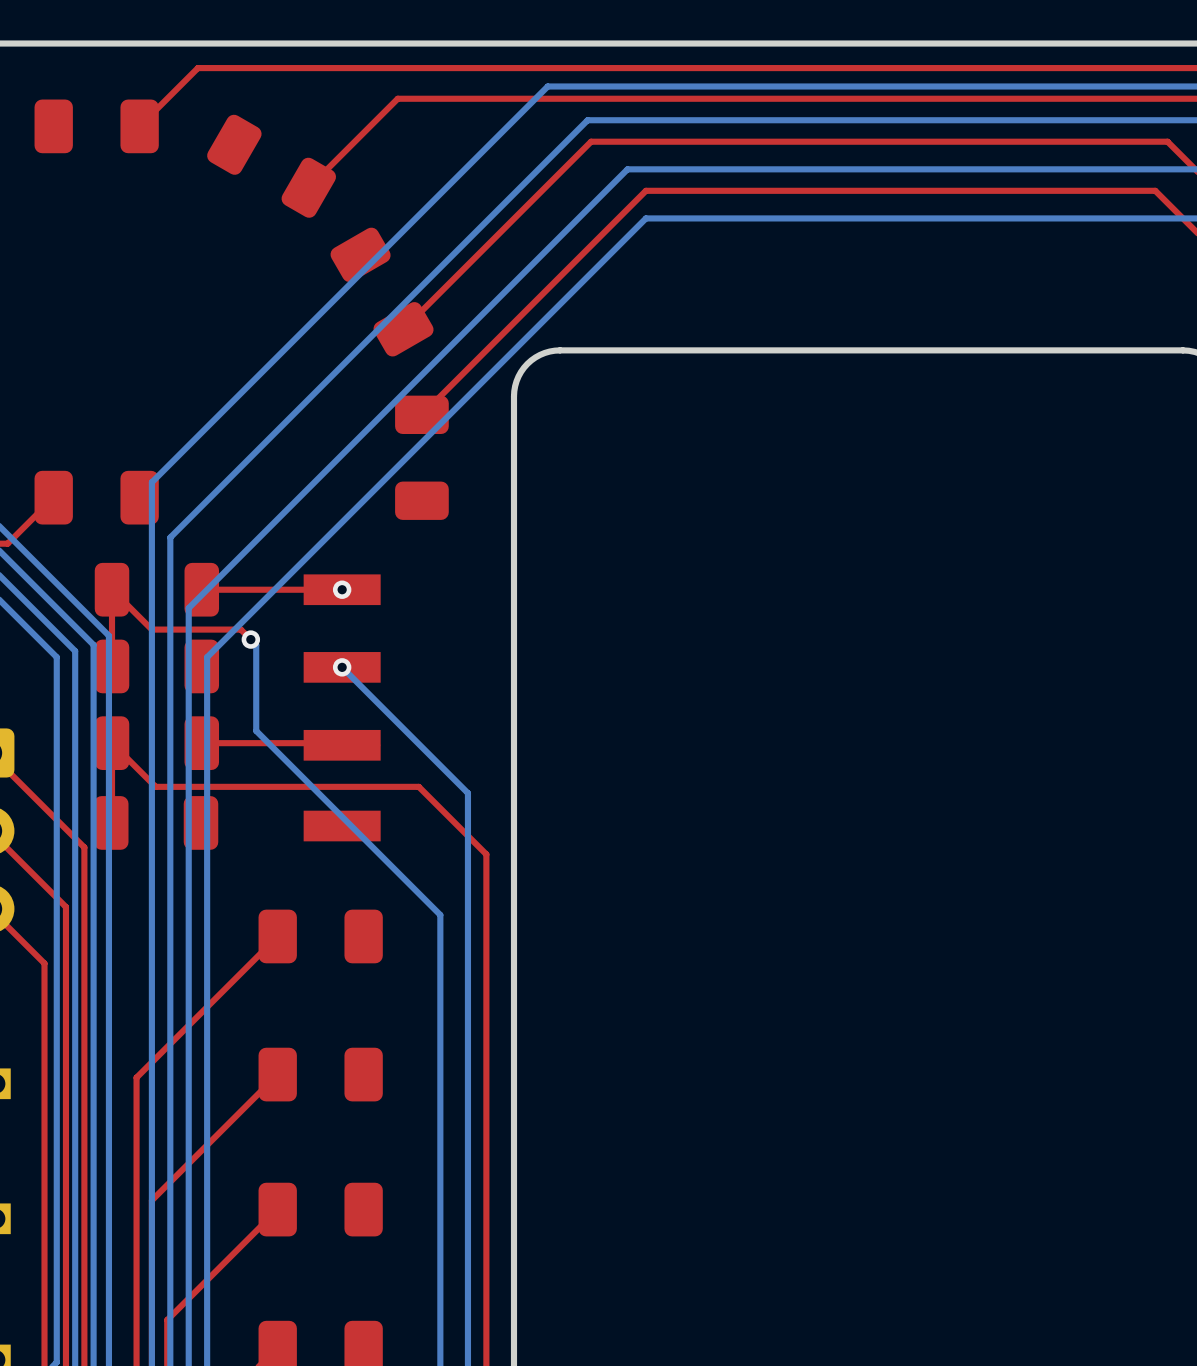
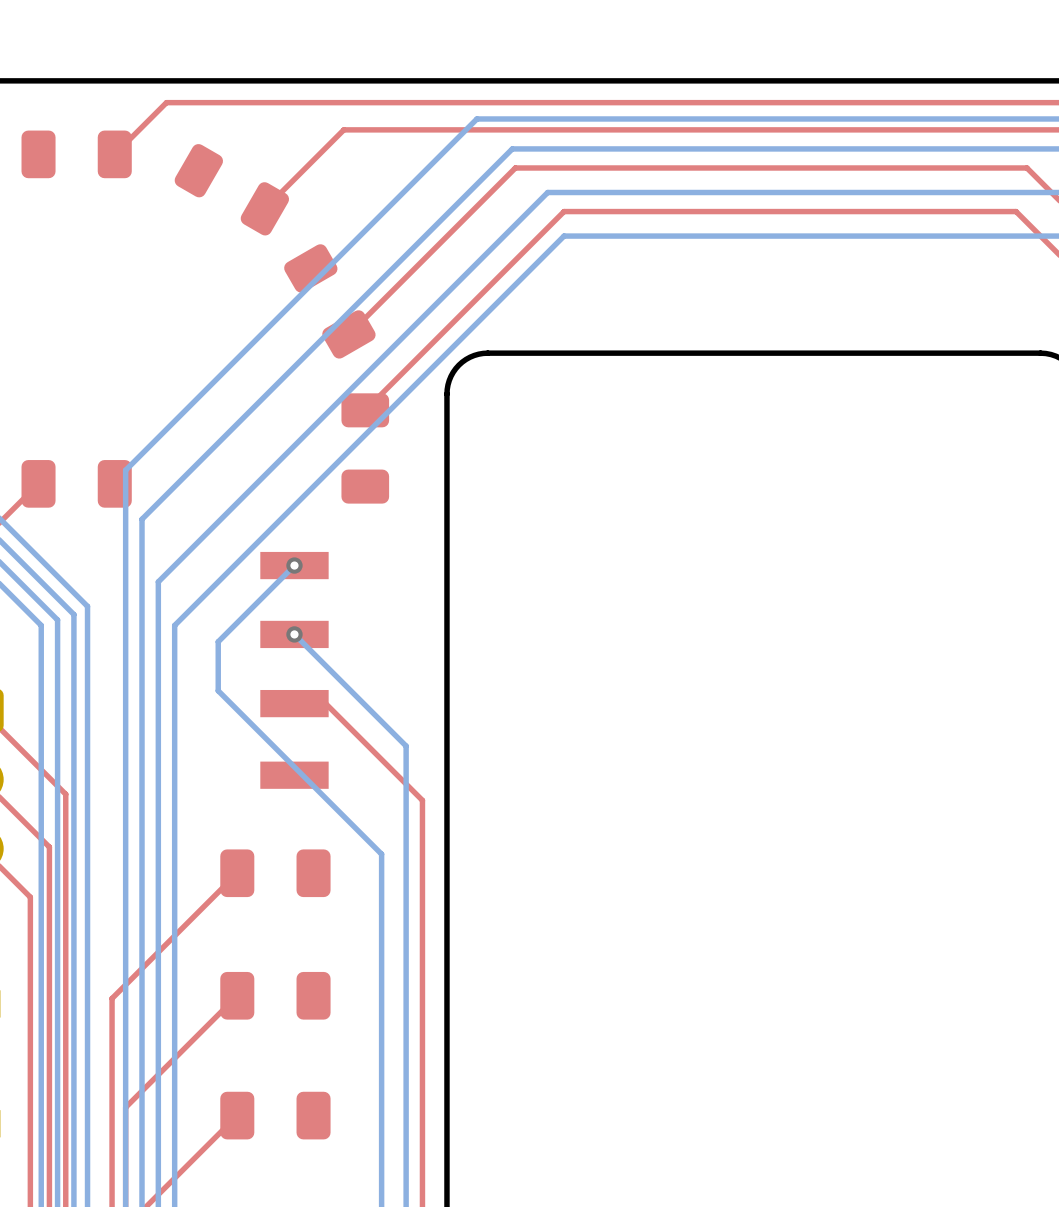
part: (156, 589) -> none
top track: (342, 589) (201, 589) -> none
bottom track: (250, 639) (256, 644) (256, 675) -> (294, 565) (218, 641)
top track: (250, 639) (240, 629) (151, 629) (112, 589) (112, 666) -> none
via: (250, 639) -> none
part: (156, 666) -> none
part: (156, 743) -> none
top track: (201, 743) (340, 743) (342, 745) -> none
top track: (418, 786) (155, 786) (112, 743) (111, 822) -> (362, 740) (325, 703)
part: (156, 822) -> none

